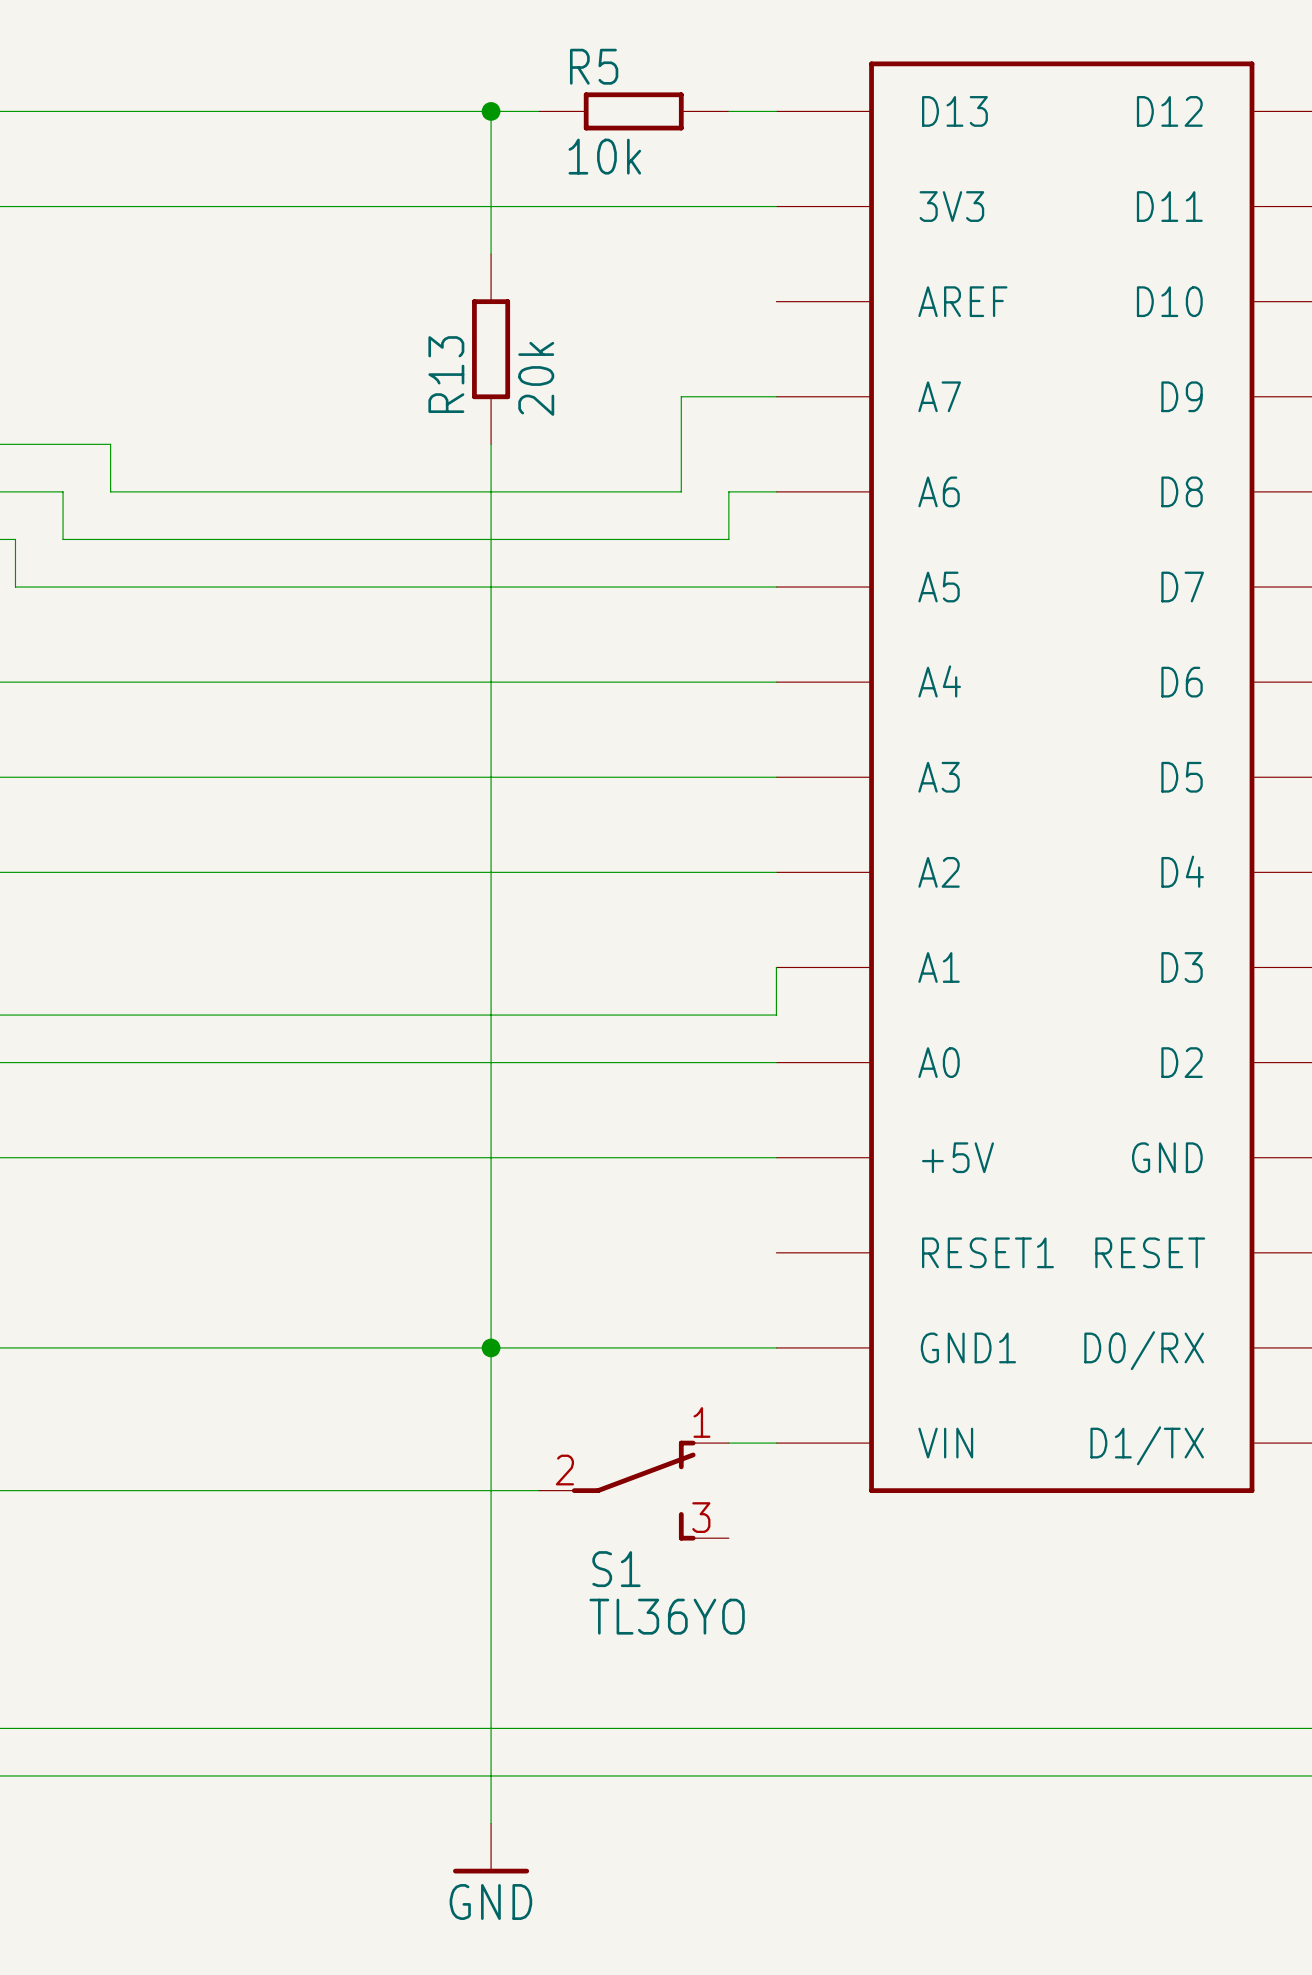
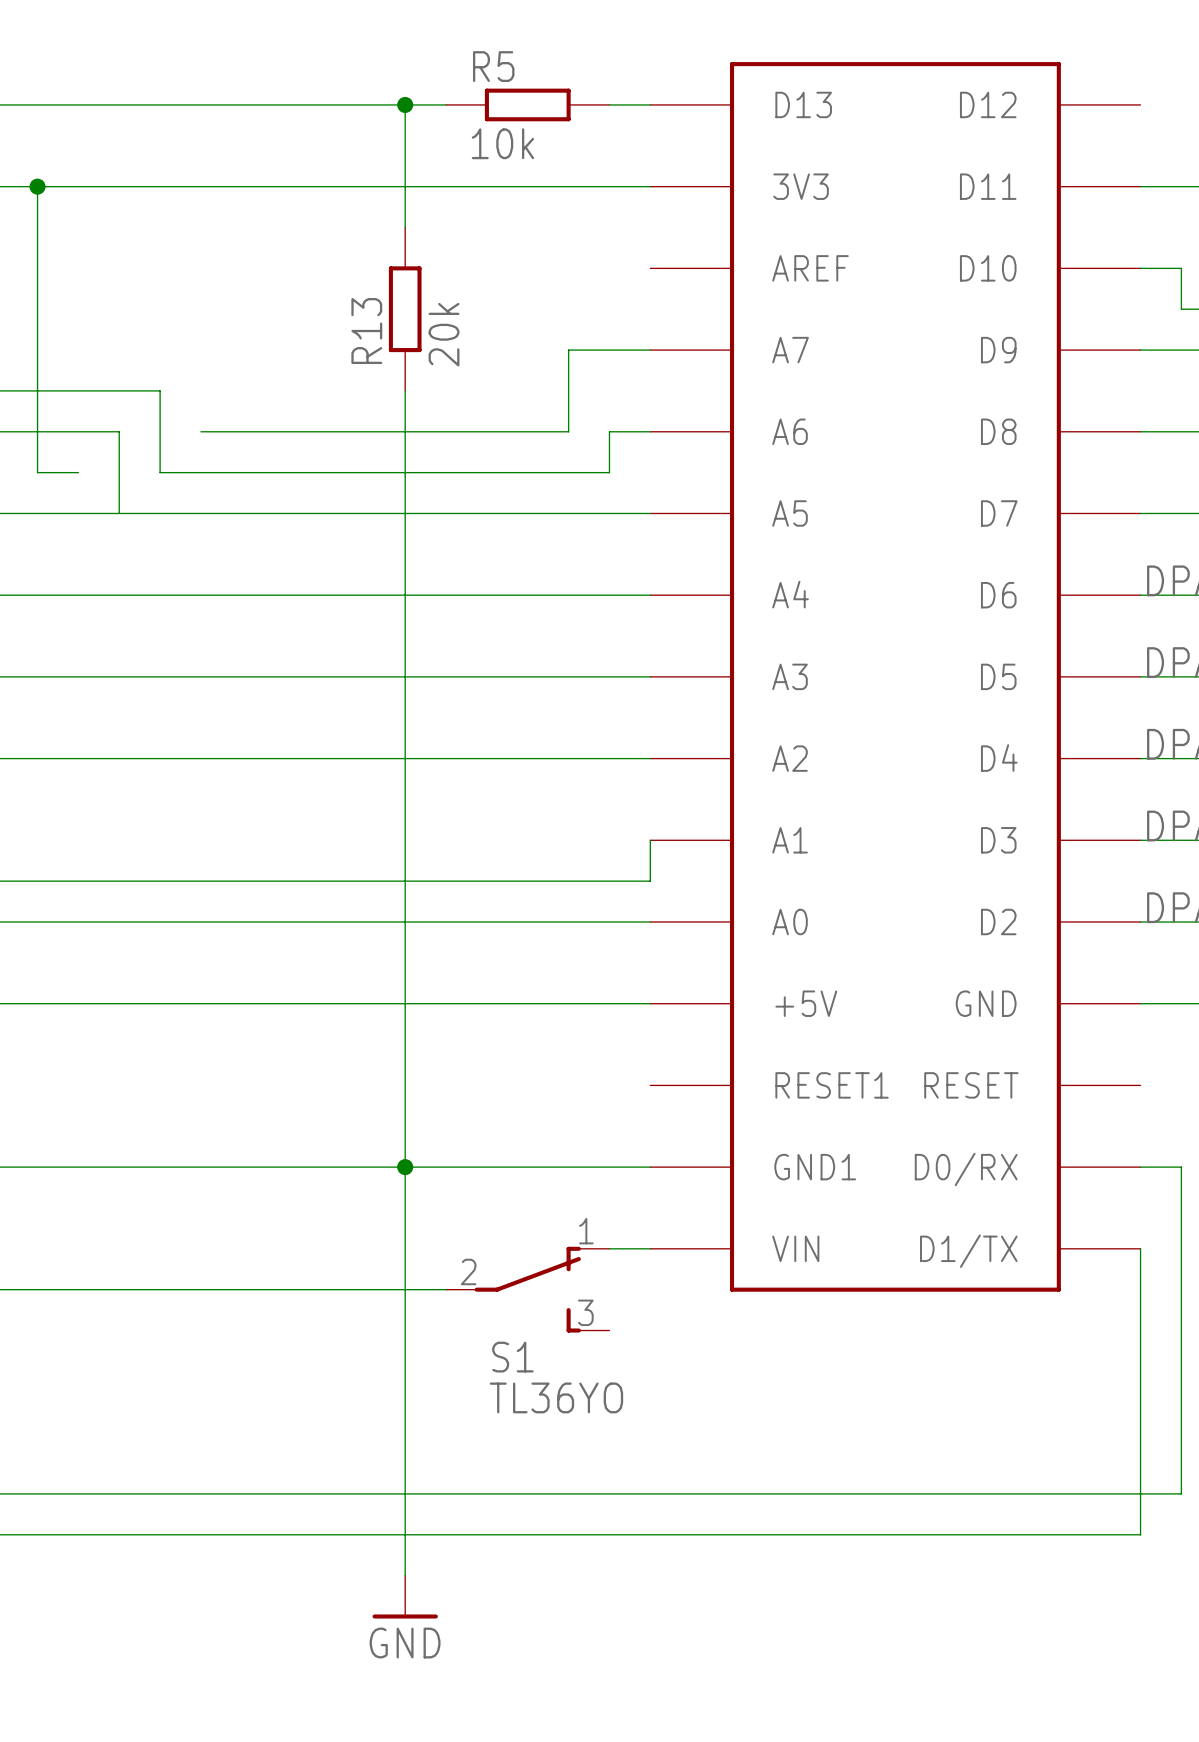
junction: none -> (37, 186)
wire: (110, 444) (110, 491) -> (37, 186) (37, 431) (78, 431)
wire: (158, 491) (253, 491) -> (119, 431) (119, 513)
wire: (110, 539) (205, 539) -> (78, 390) (160, 390) (160, 472)

